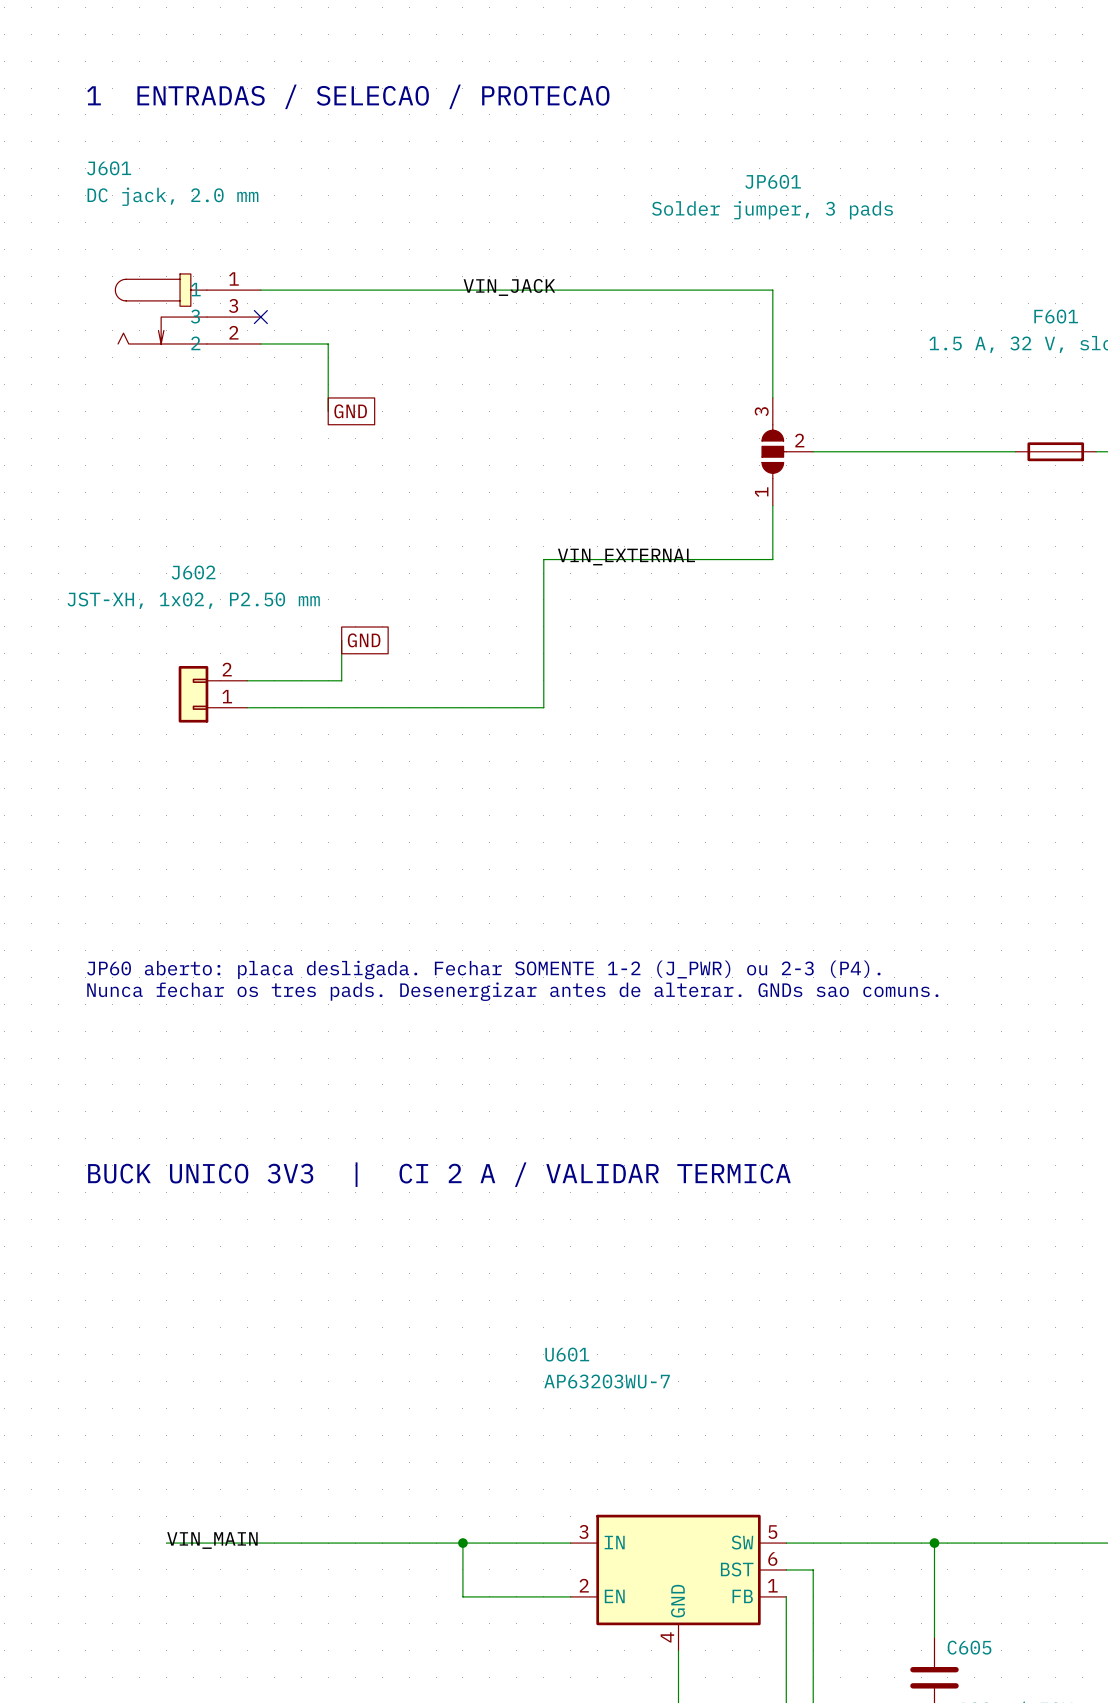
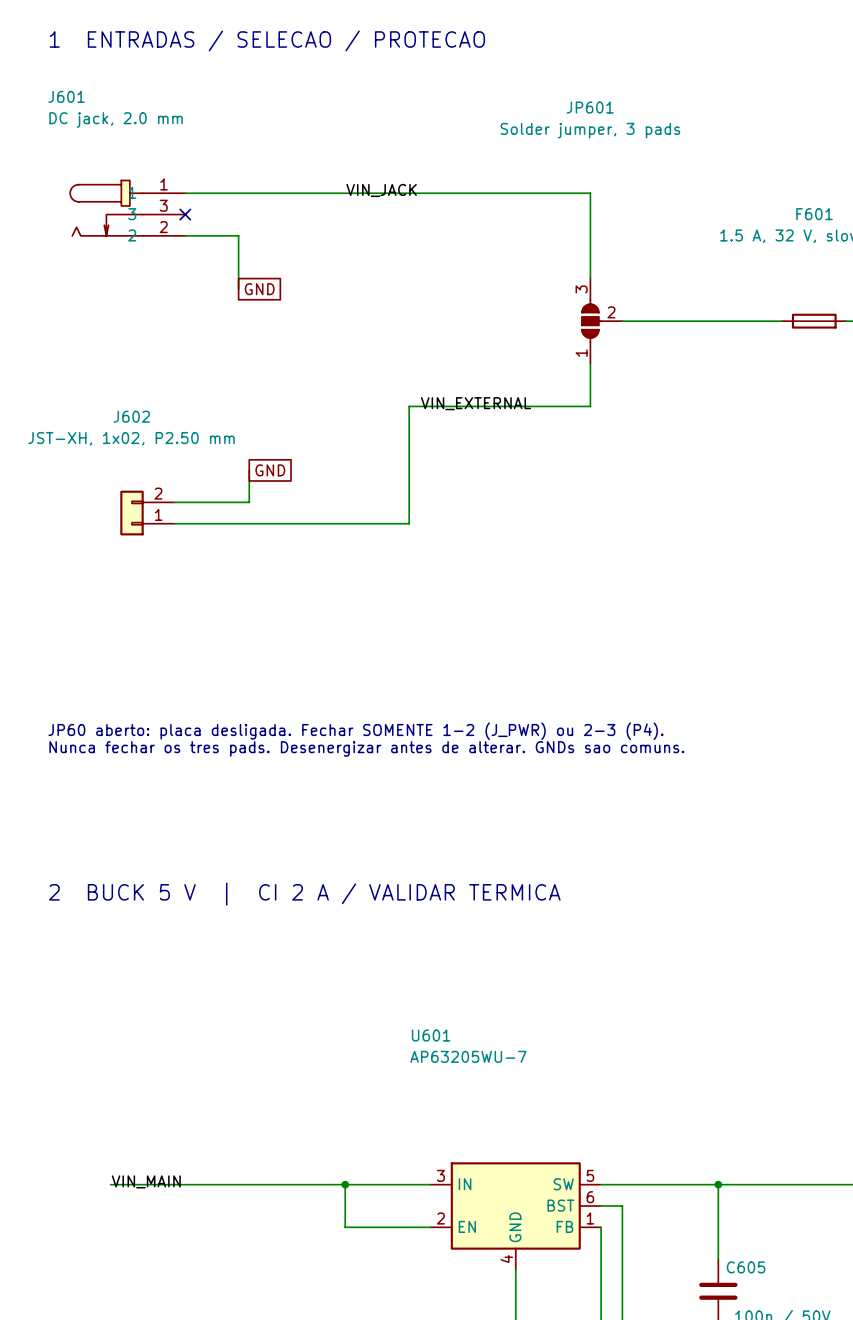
text: BUCK UNICO 3V3 | CI 2 A / VALIDAR TERMICA (439, 1174) -> 2 BUCK 5 V | CI 2 A / VALIDAR TERMICA (304, 894)
U601 value: AP63203WU-7 (607, 1381) -> AP63205WU-7 (468, 1056)

